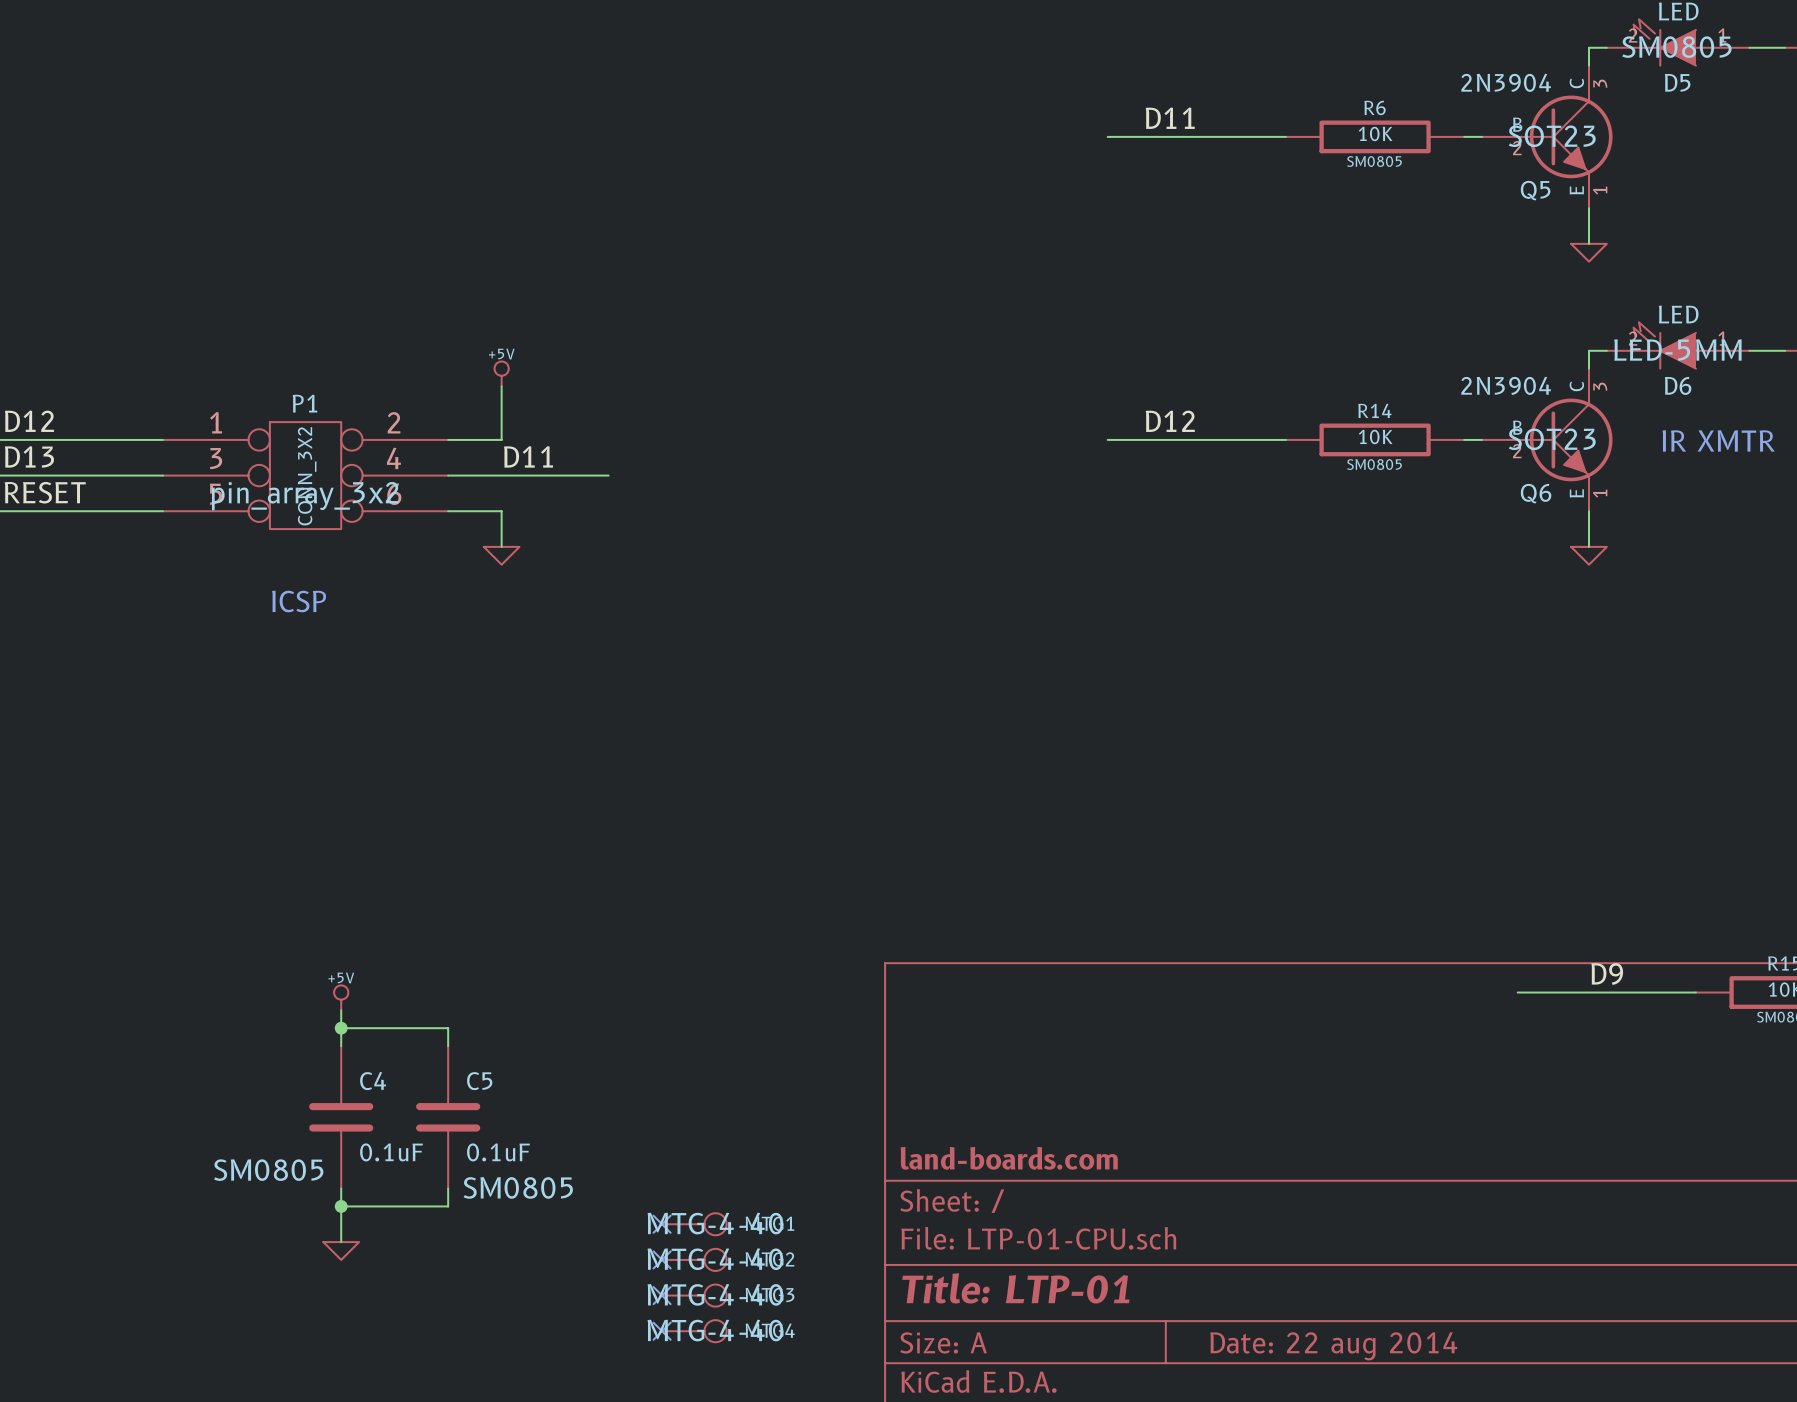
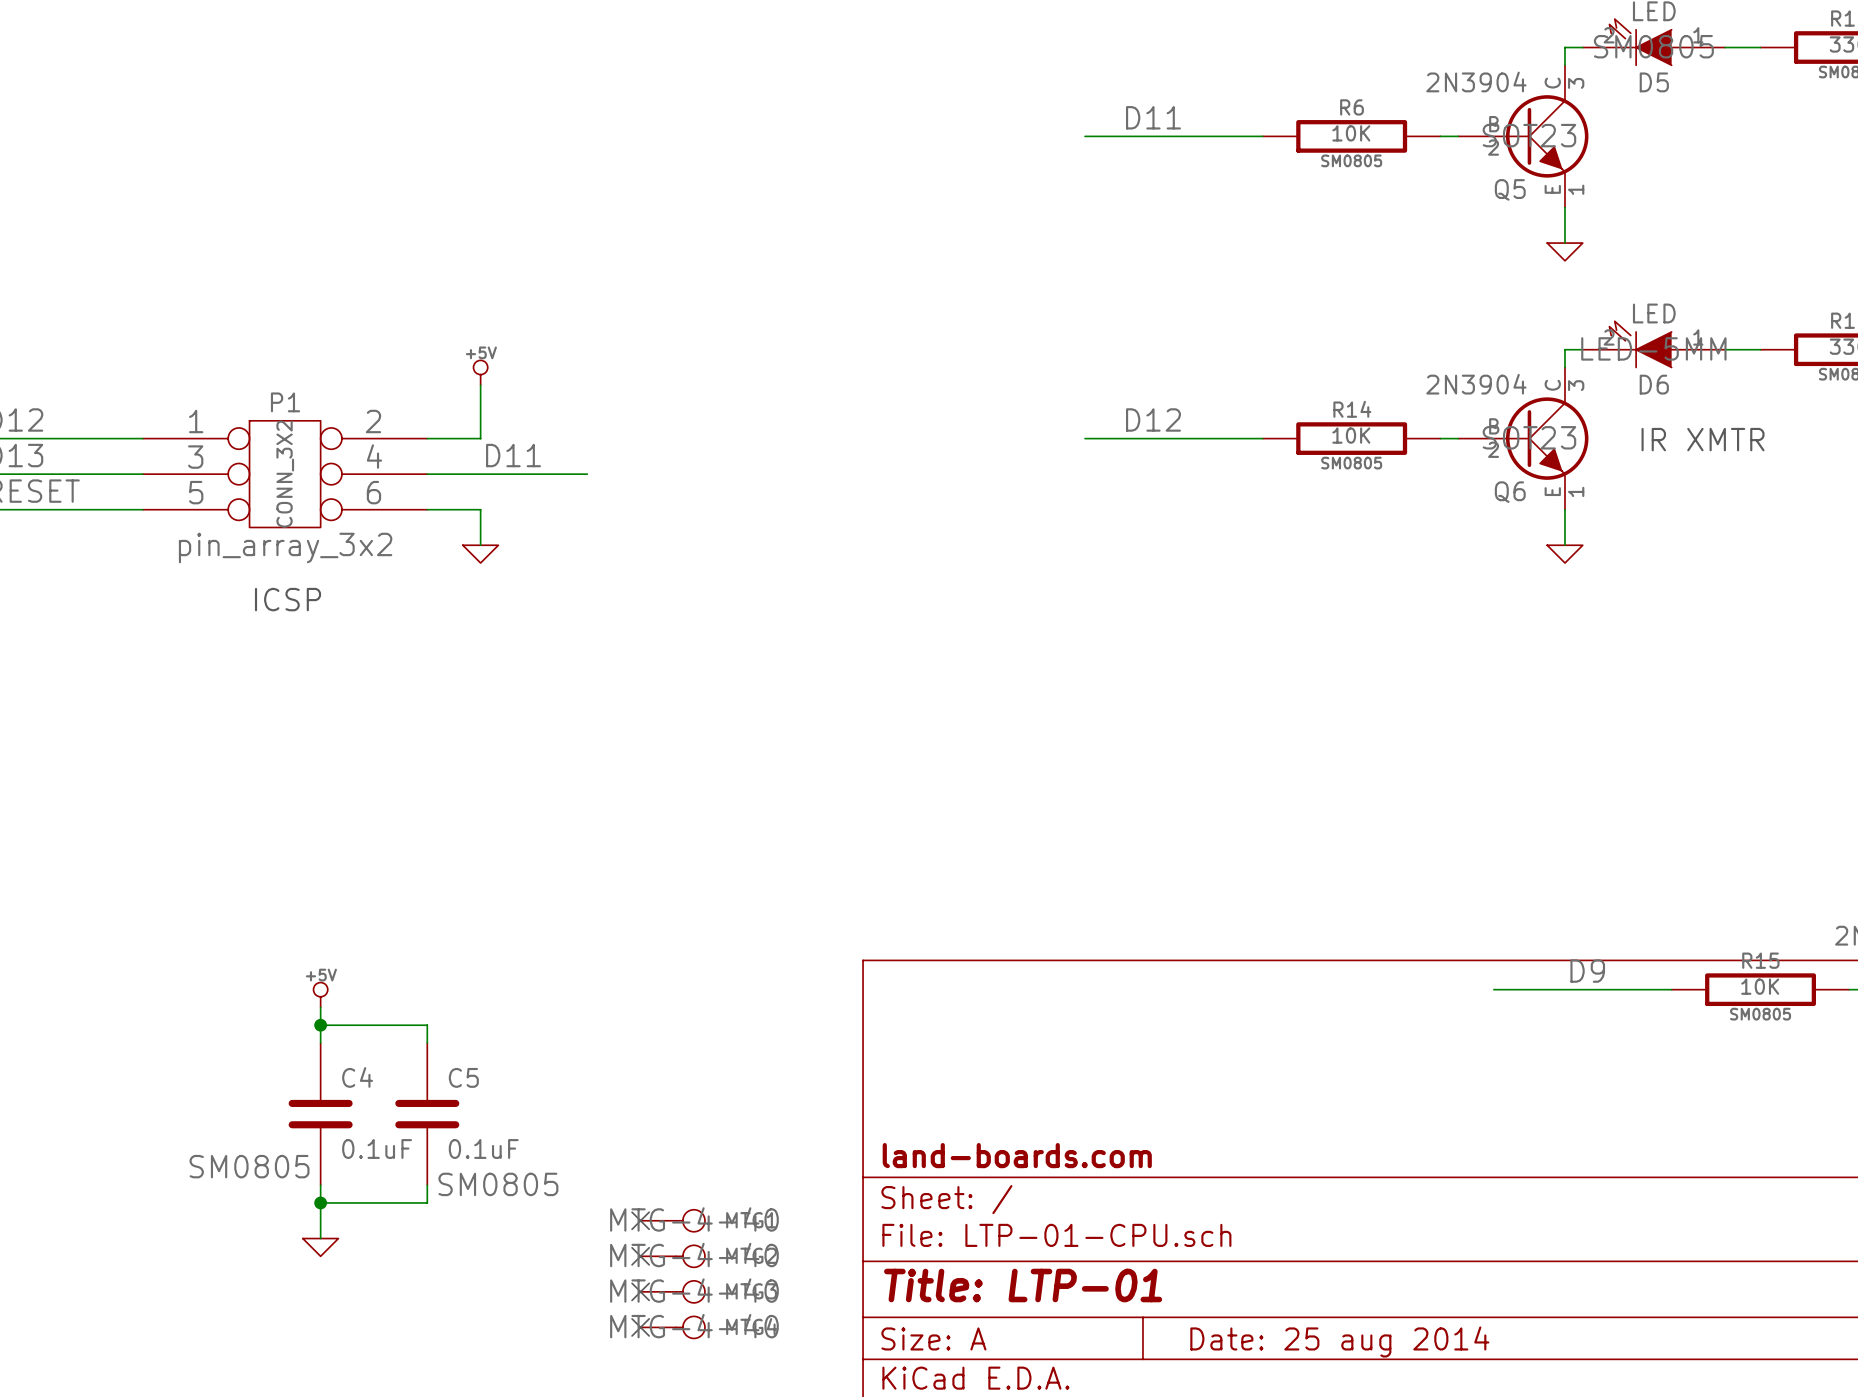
P1 text position: pin_array_3x2 (305, 496) -> pin_array_3x2 (285, 548)
title block: Date: 22 aug 2014 (1333, 1346) -> Date: 25 aug 2014 (1339, 1341)

